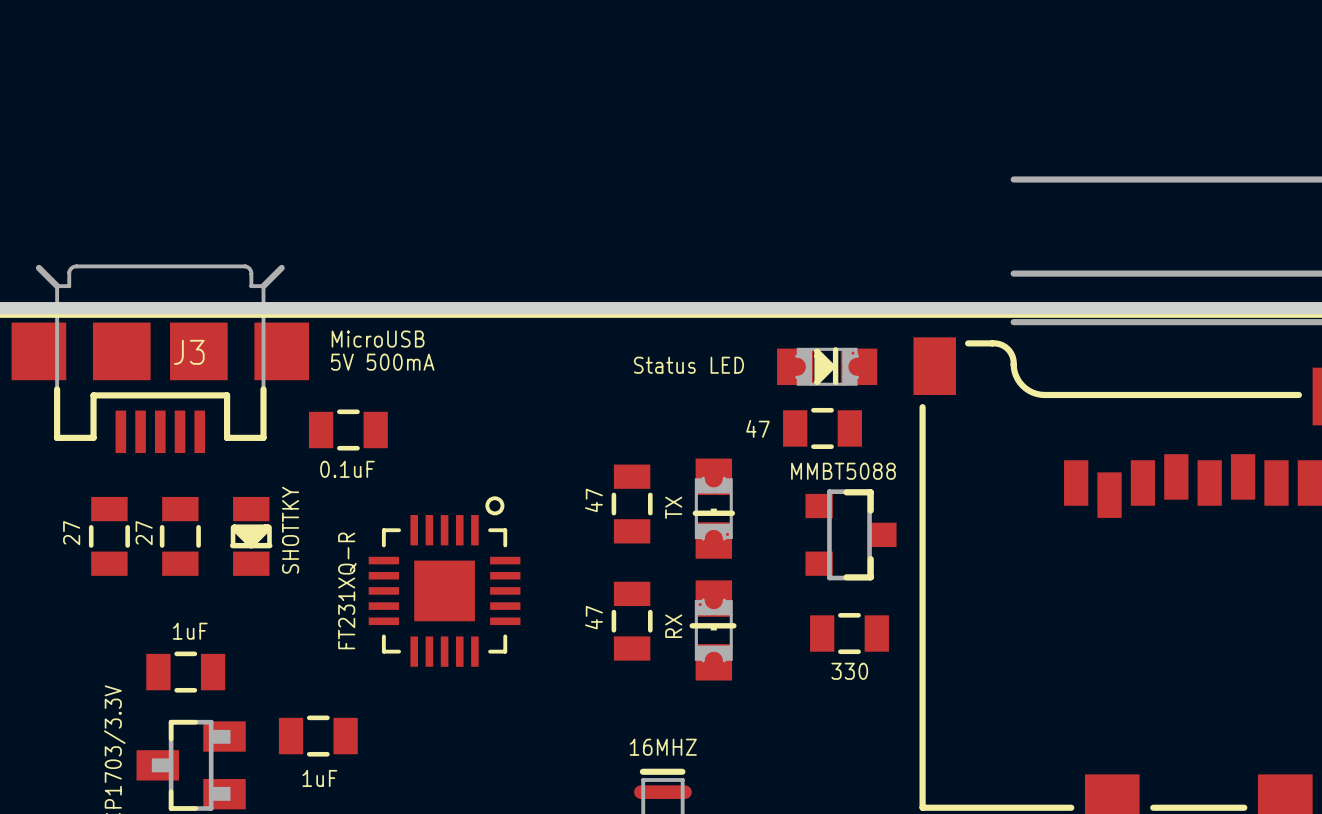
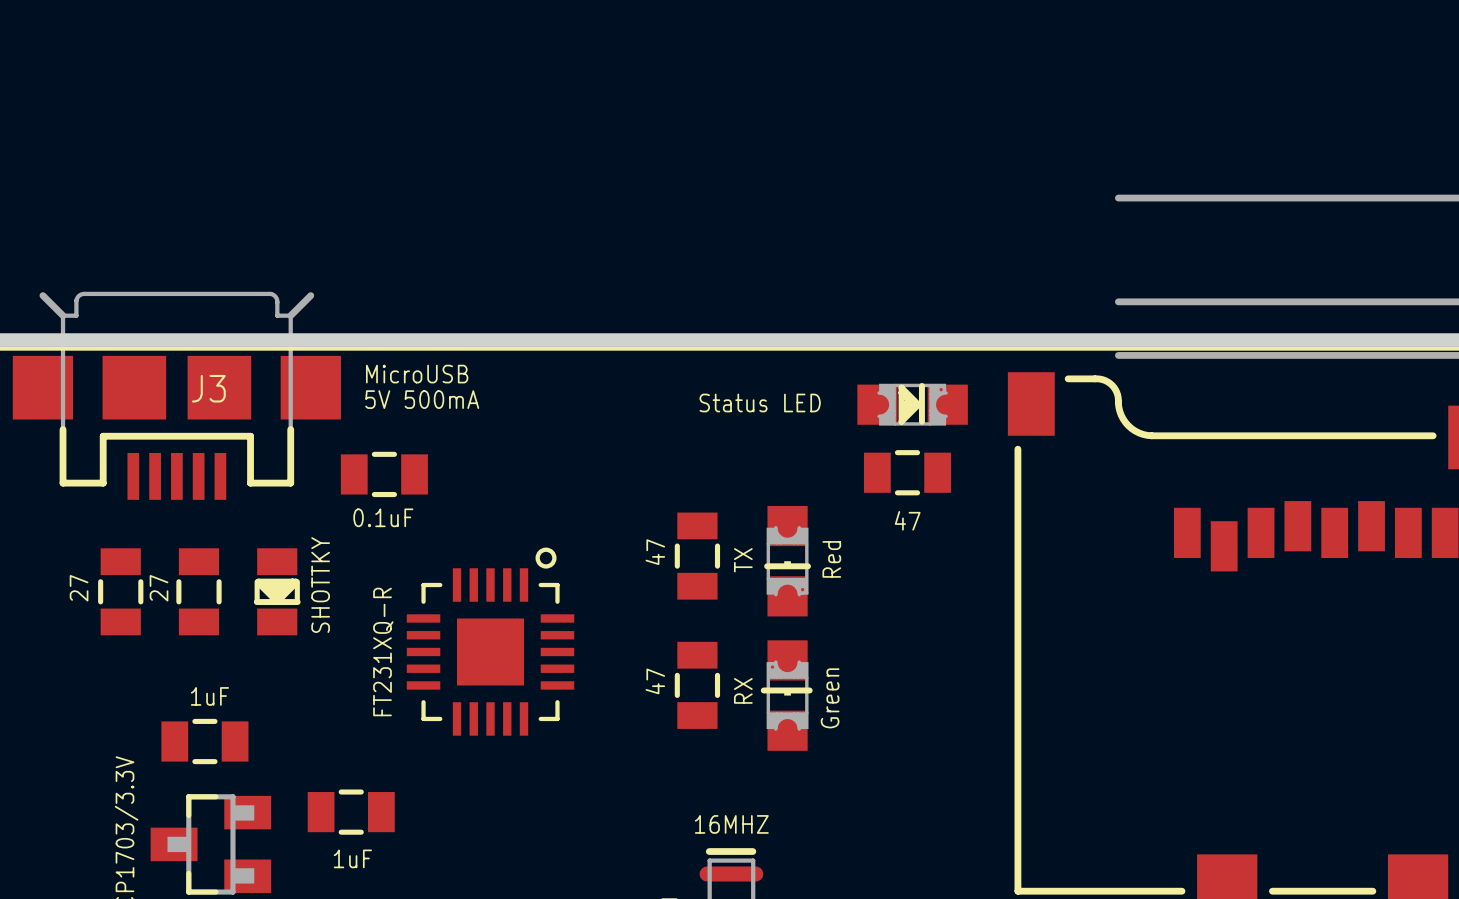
part value position: 47 (757, 428) -> 47 (907, 520)
TX value: none -> Red (831, 559)
part: MMBT5088 (851, 534) -> none
RX value: none -> Green (830, 698)
part: 330 (849, 633) -> none

